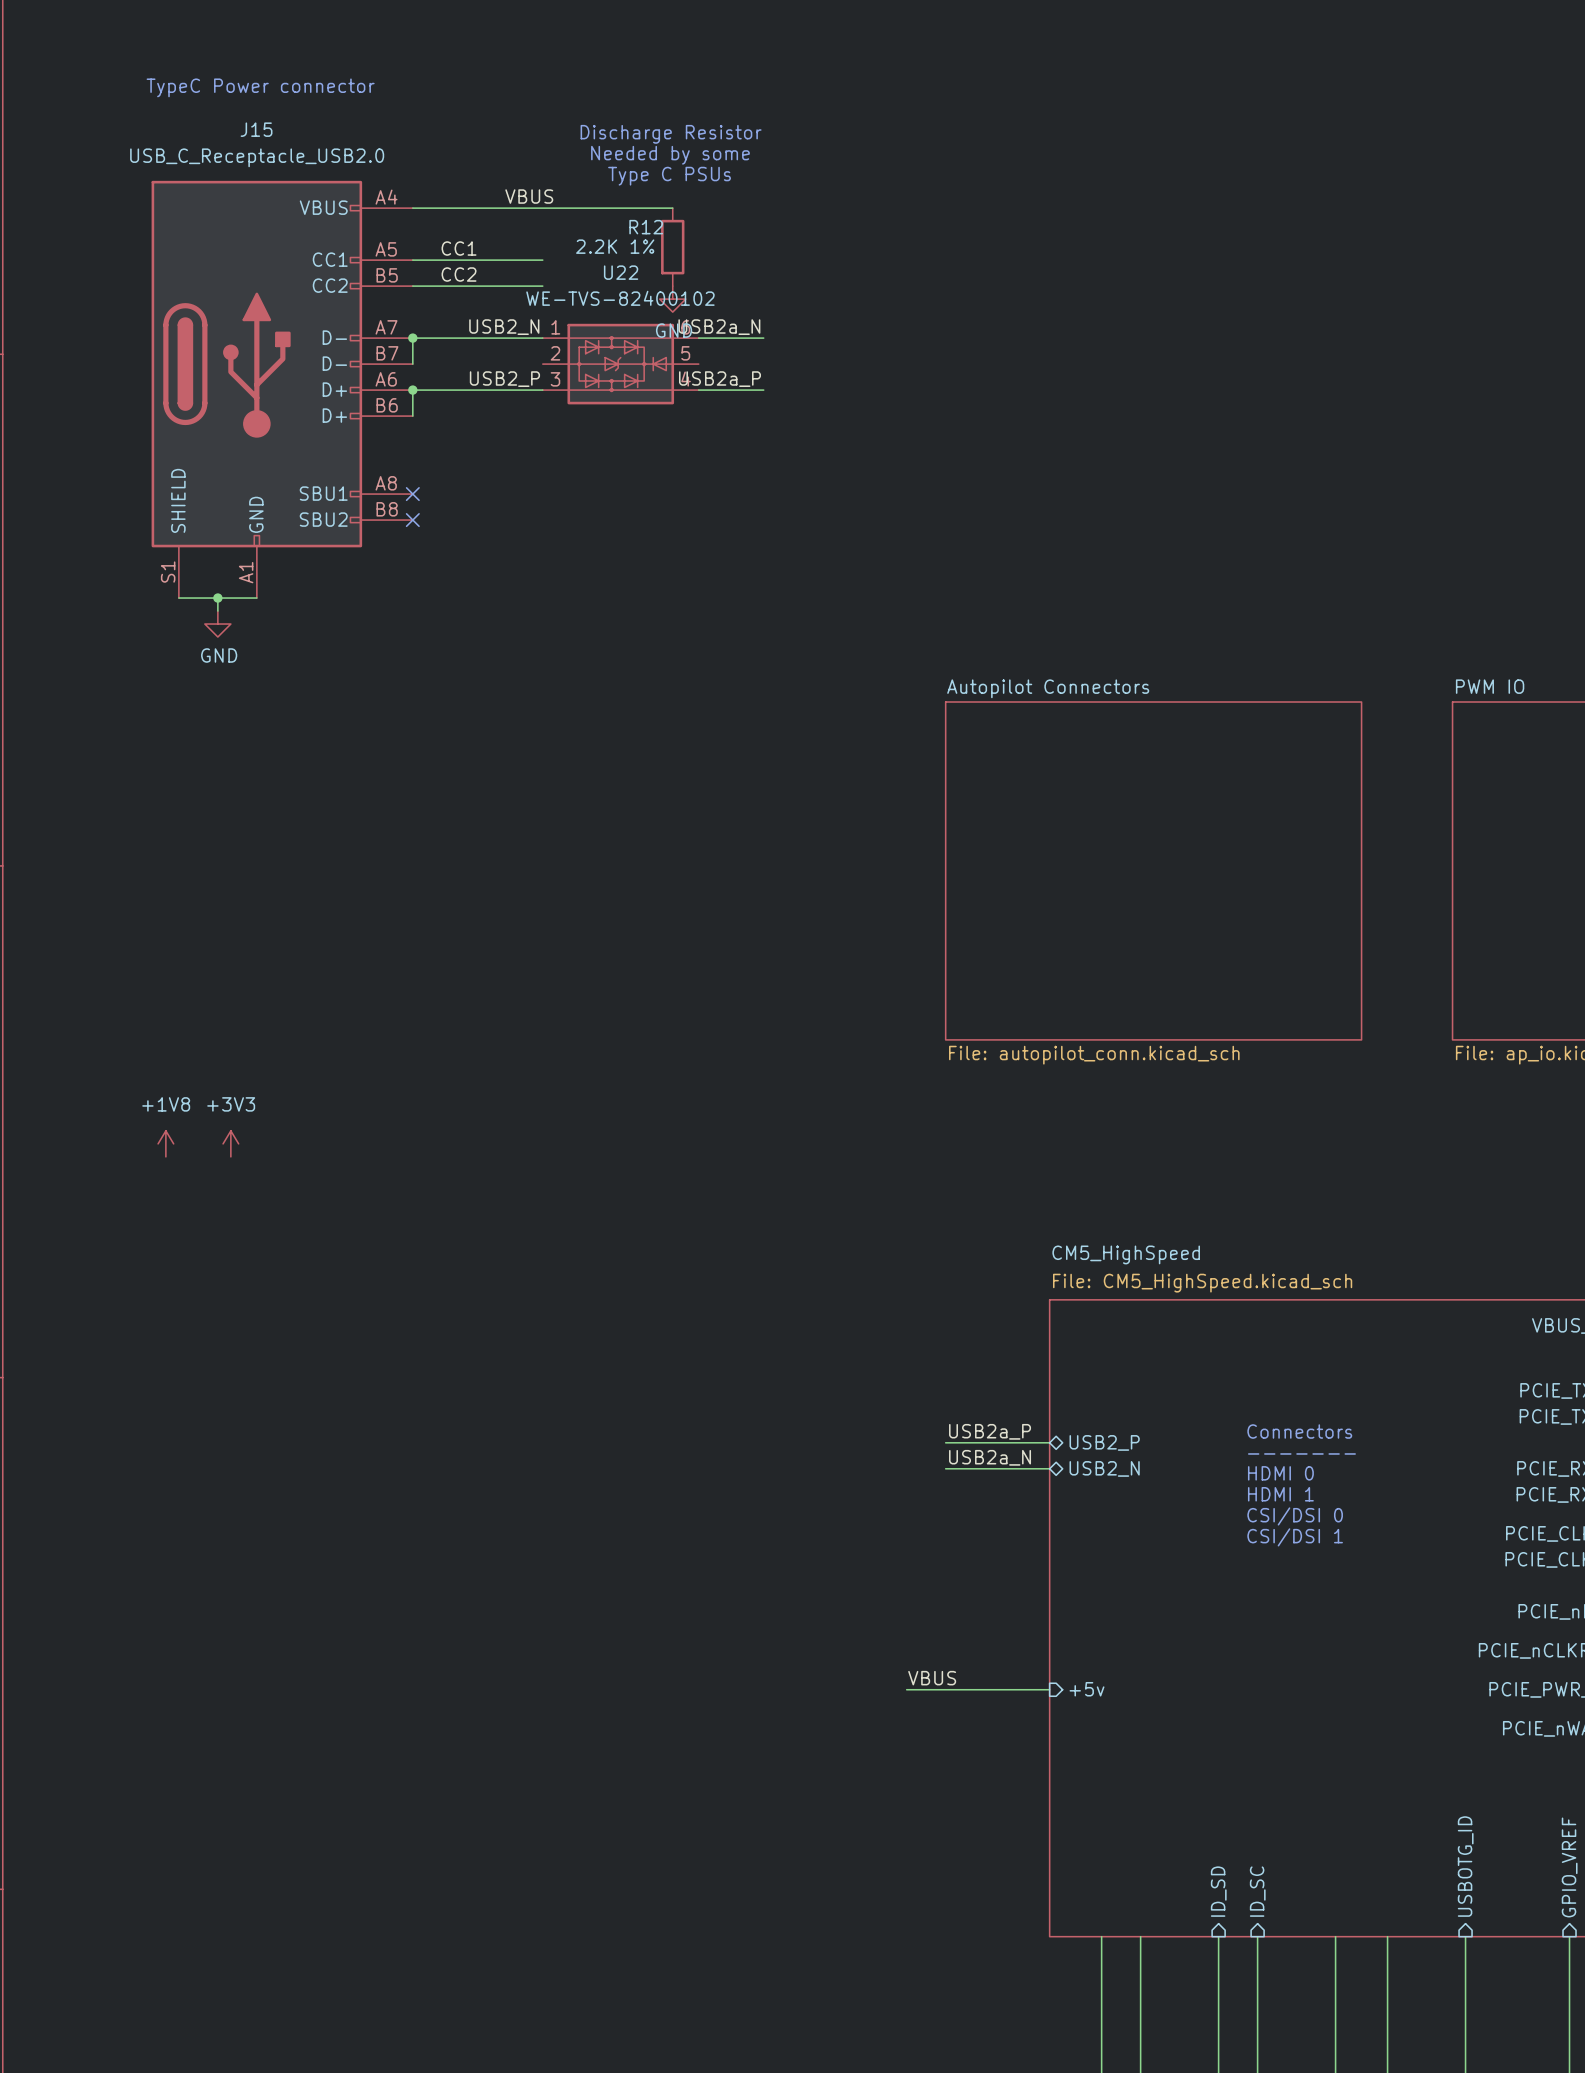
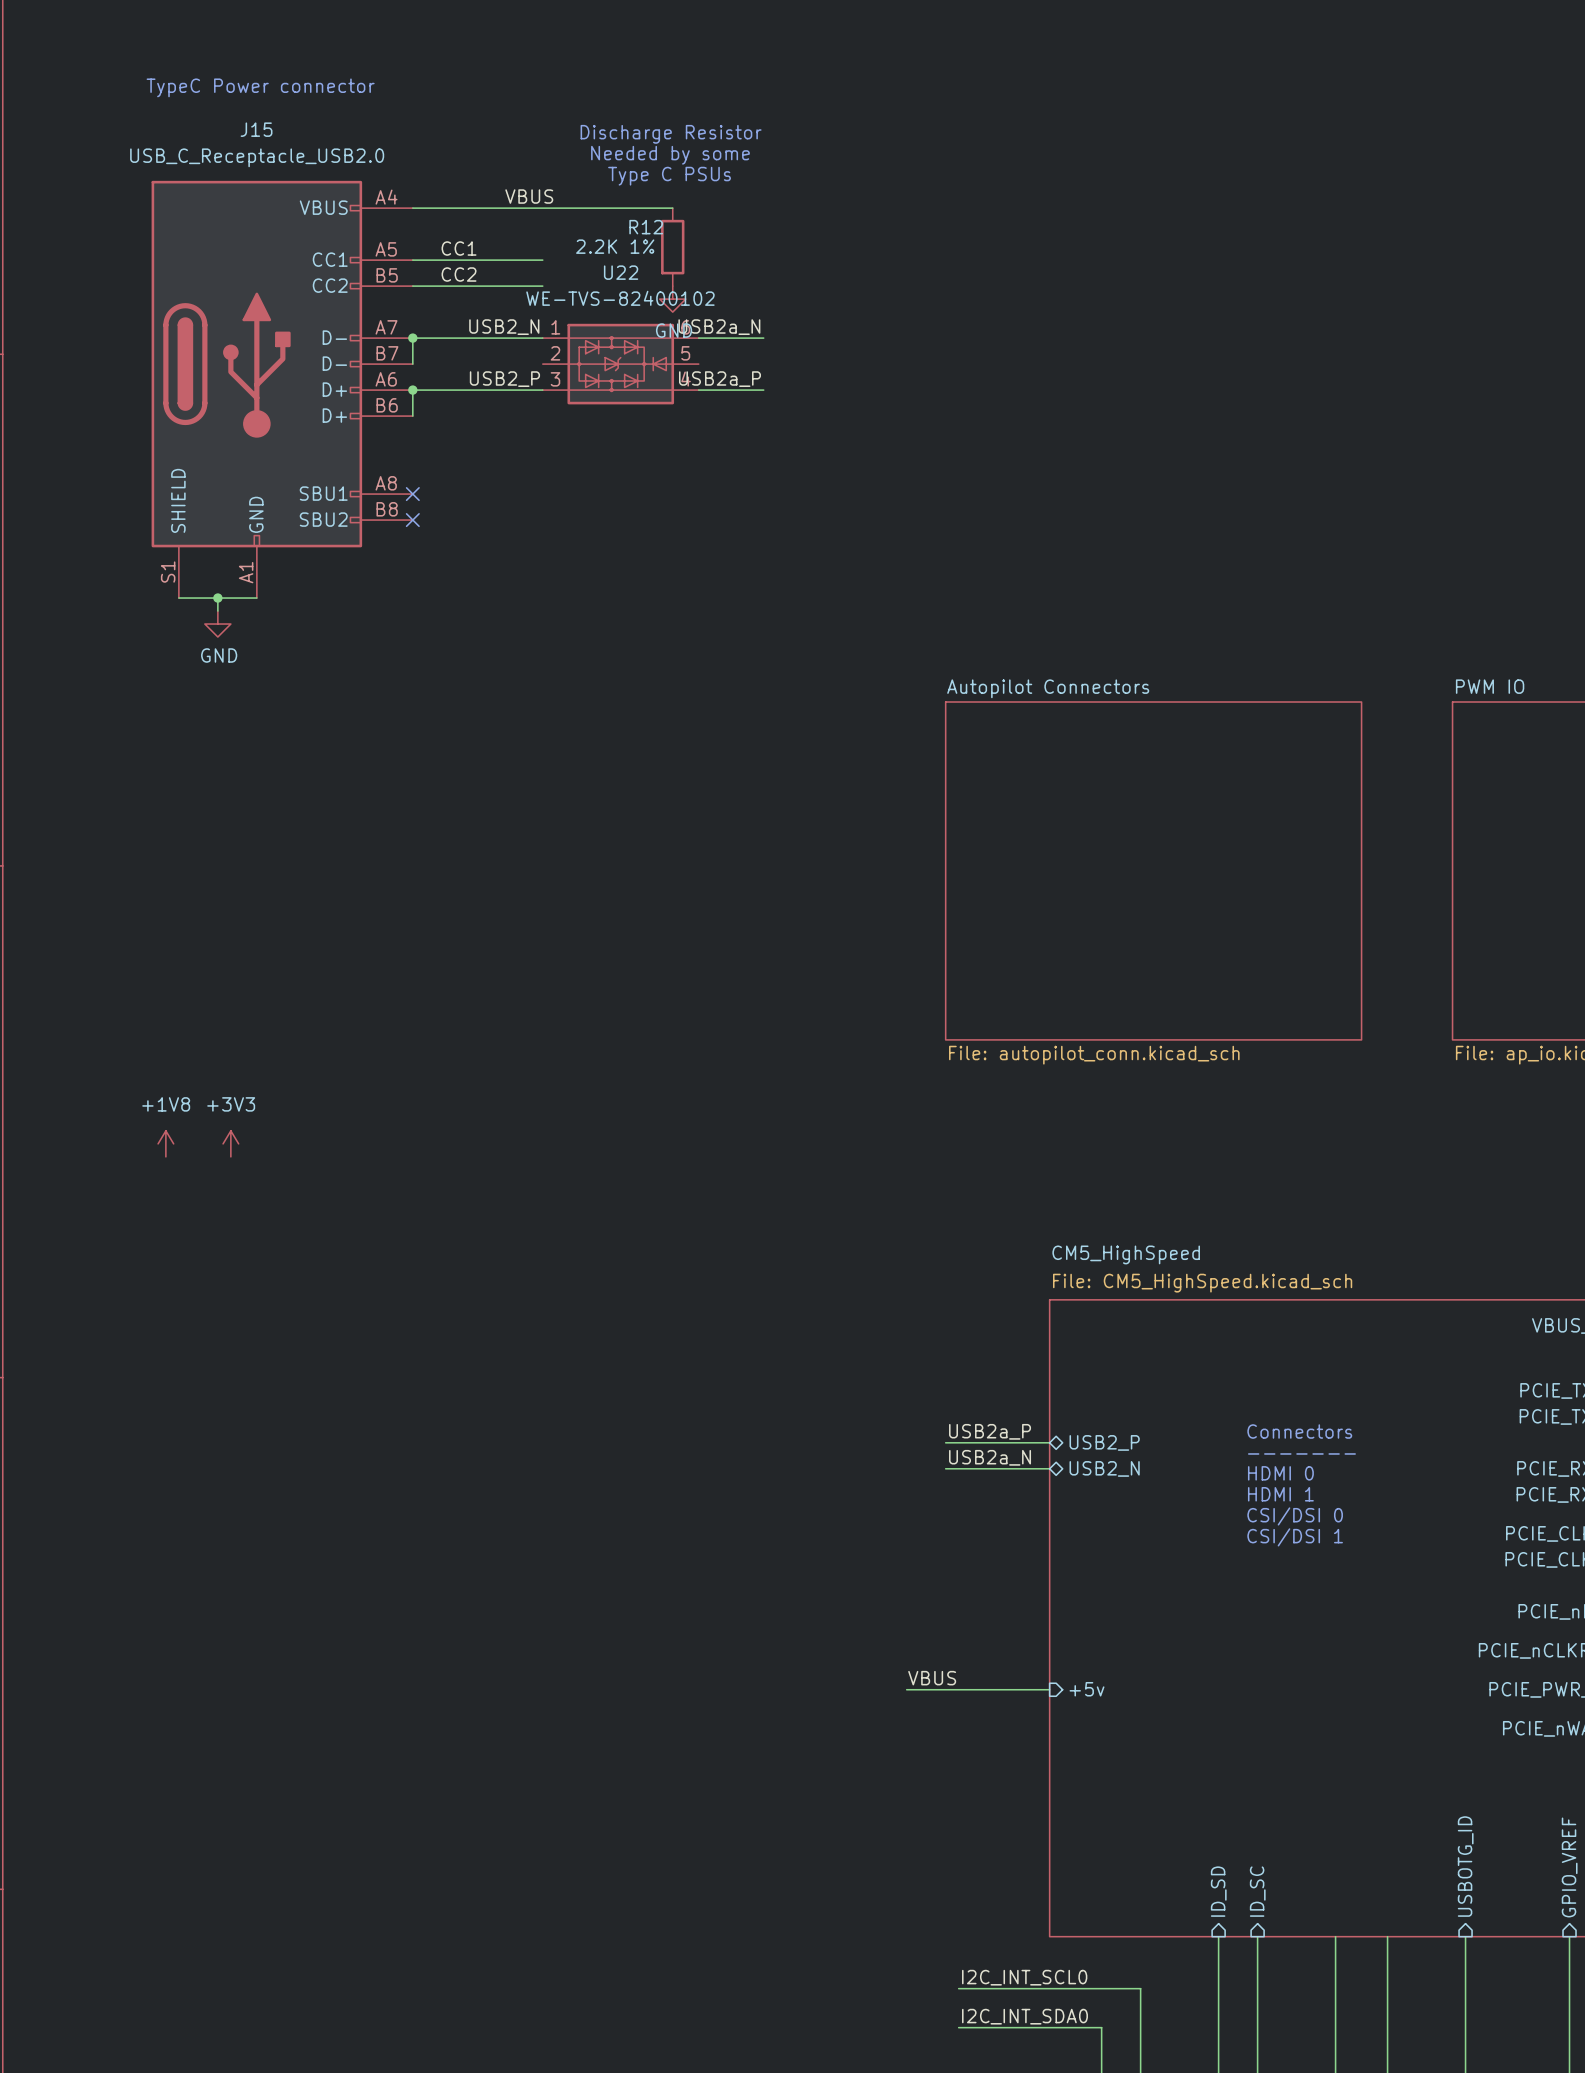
wire: (1101, 1936) (1101, 2027) -> (958, 2027) (1101, 2027)
wire: (1140, 1936) (1140, 1988) -> (958, 1988) (1140, 1988)
label: none -> I2C_INT_SCL0 (1024, 1977)
label: none -> I2C_INT_SDA0 (1024, 2016)

